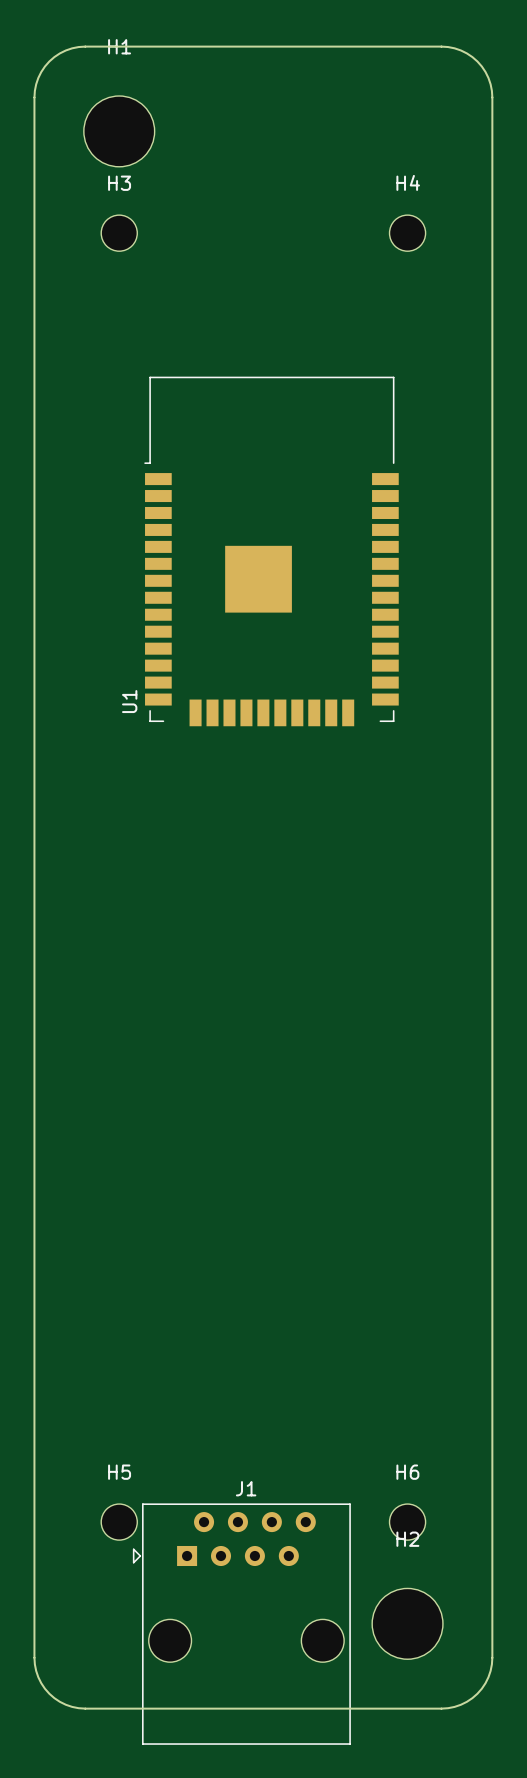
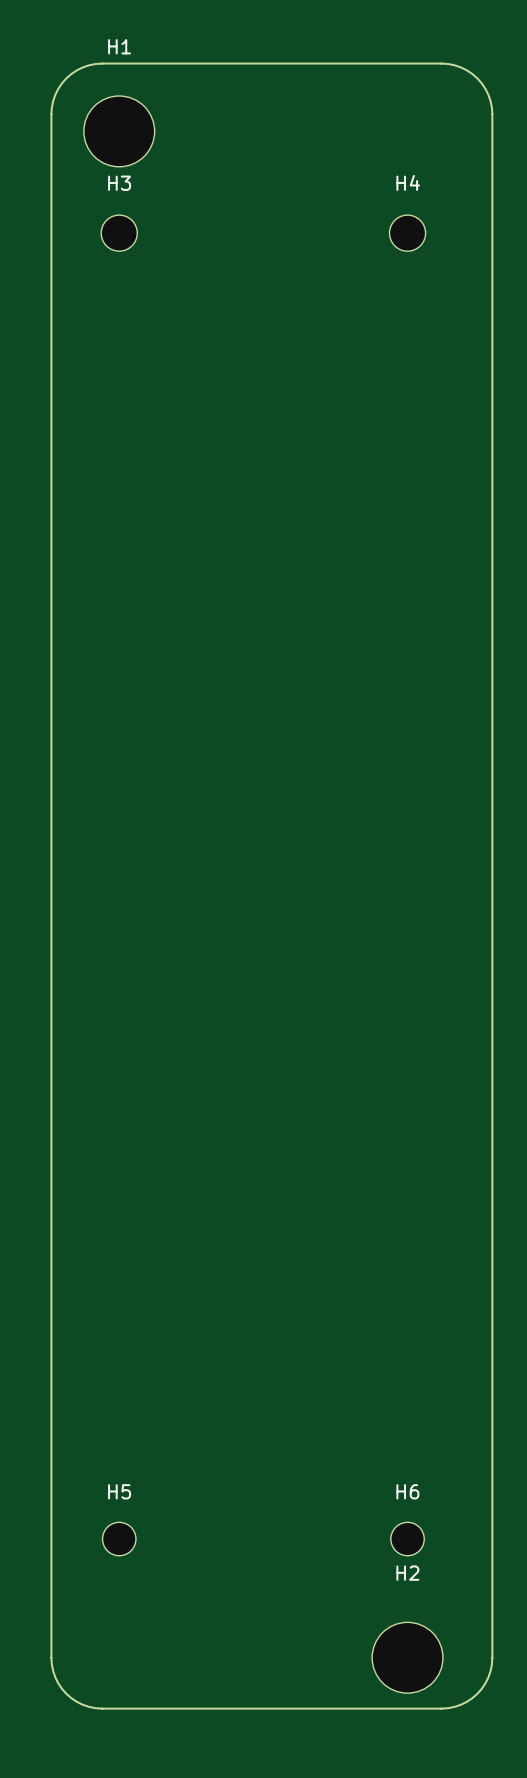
board edge: (492, 114) (491, 90) (485, 72) (472, 57) (460, 50) (448, 47) (78, 47) (59, 53) (49, 61) (41, 72) (36, 84) (34, 97) (34, 1657) (36, 1670) (41, 1683) (54, 1698) (72, 1706) (102, 1708) -> (492, 114) (488, 94) (477, 78) (460, 67) (441, 63) (95, 63) (76, 70) (66, 78) (58, 89) (53, 101) (51, 114) (51, 1657) (55, 1677) (66, 1693) (82, 1704) (102, 1708)
U1: (271, 551) -> none
H5 footprint: [101, 1504, 138, 1541] -> [102, 1522, 136, 1556]
H6 footprint: [389, 1504, 426, 1541] -> [390, 1522, 425, 1556]
H2 position: (407, 1623) -> (407, 1657)
J1: (241, 1624) -> none

